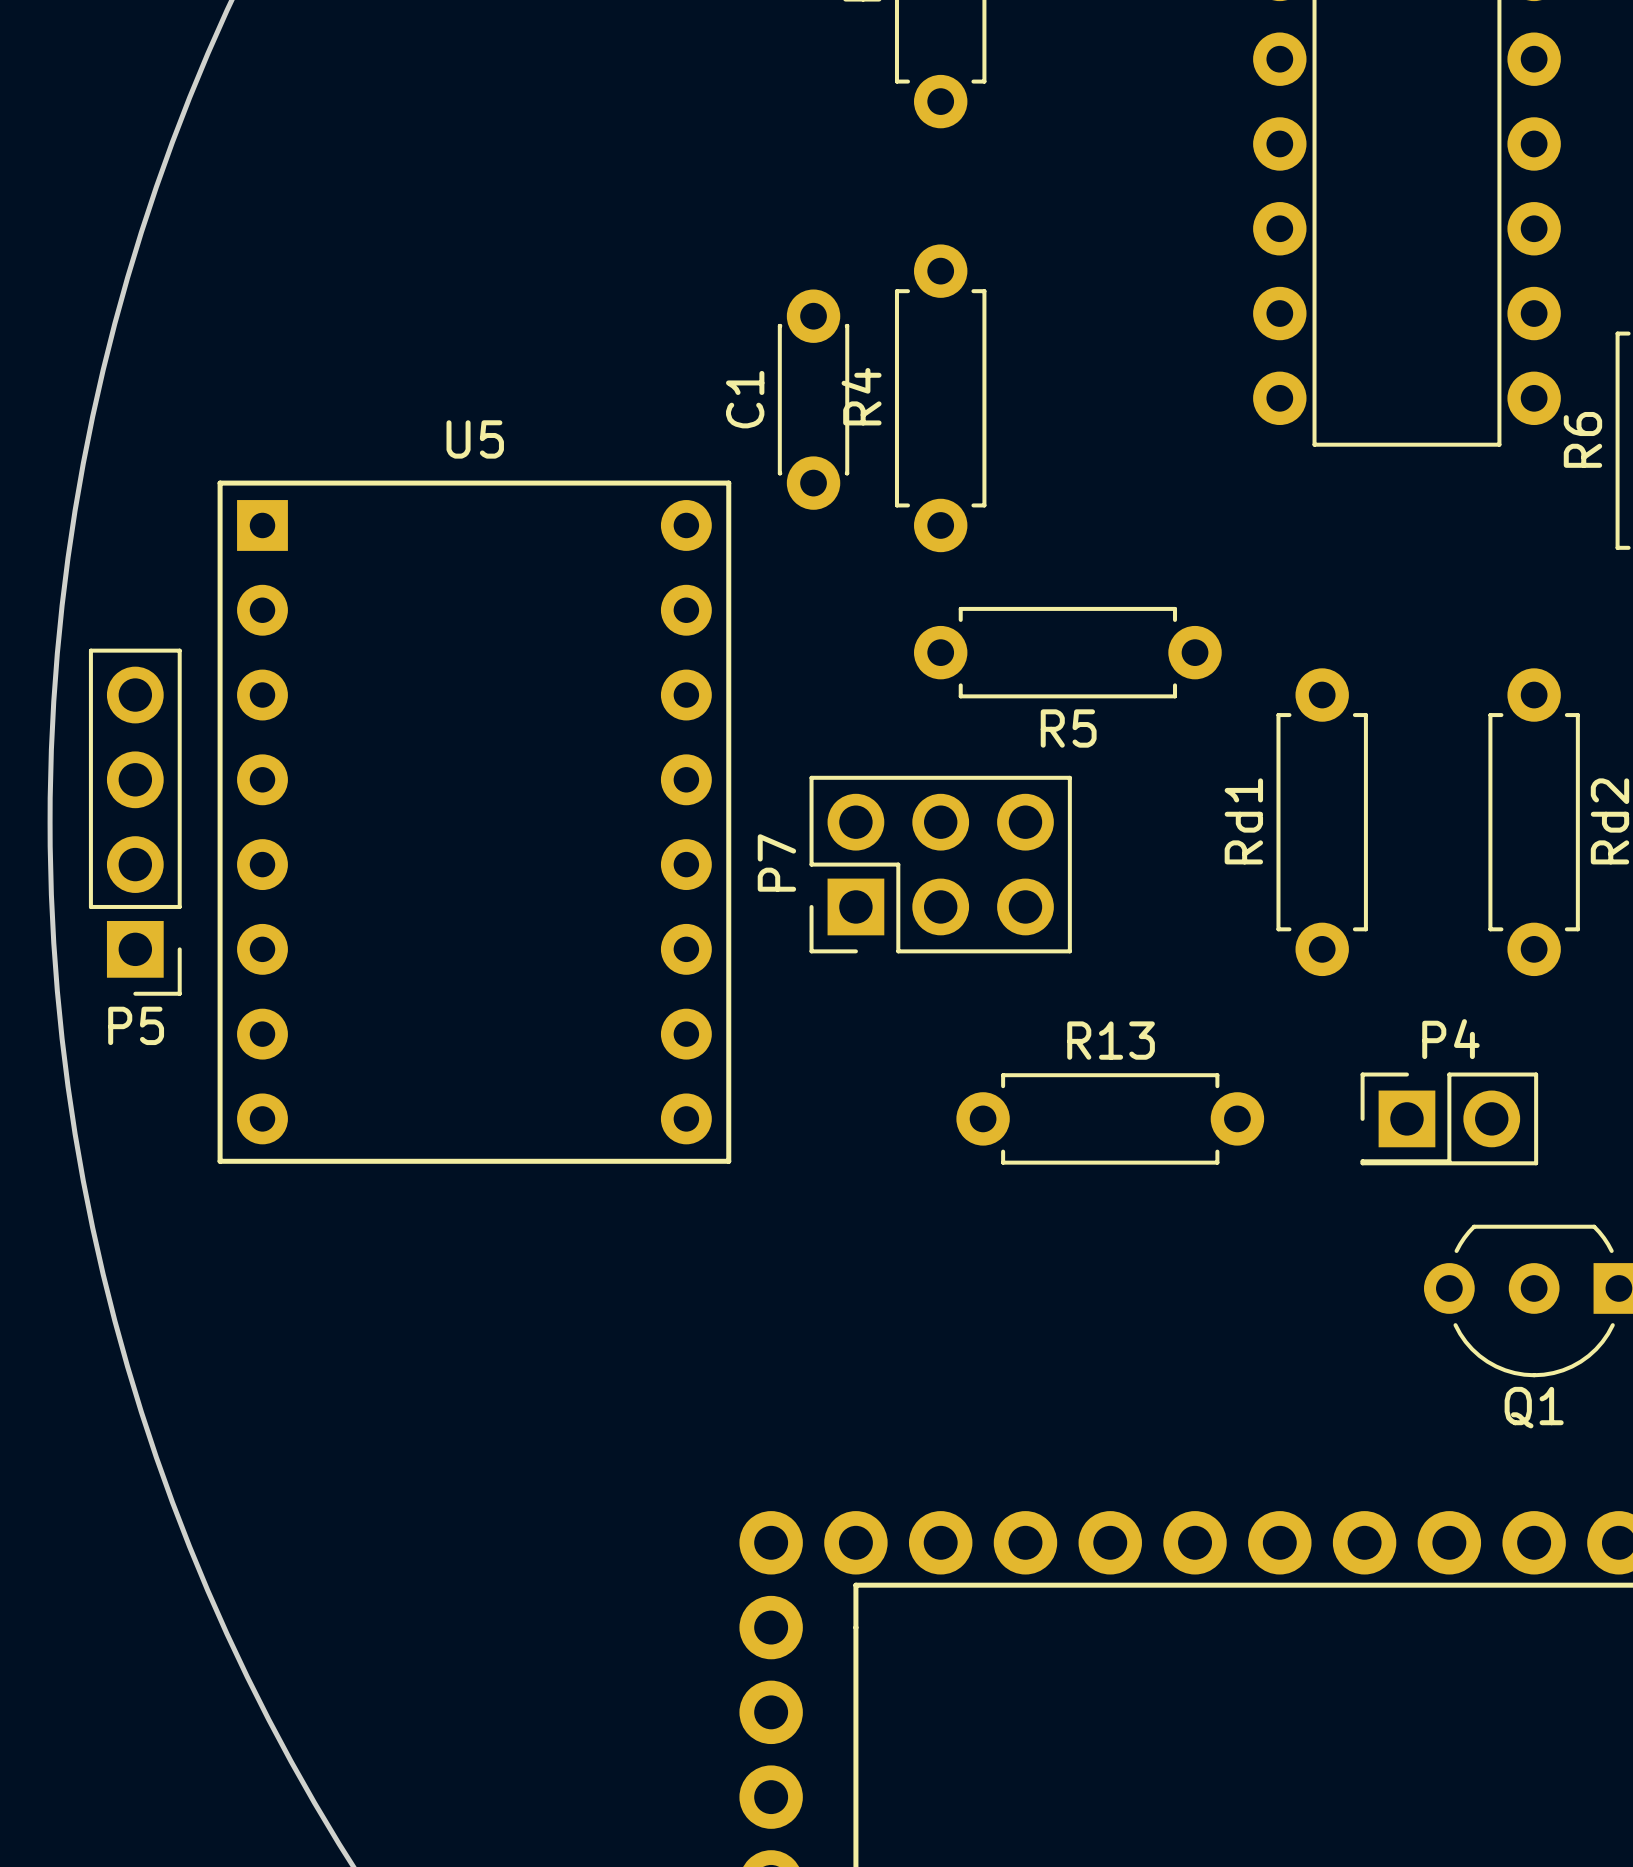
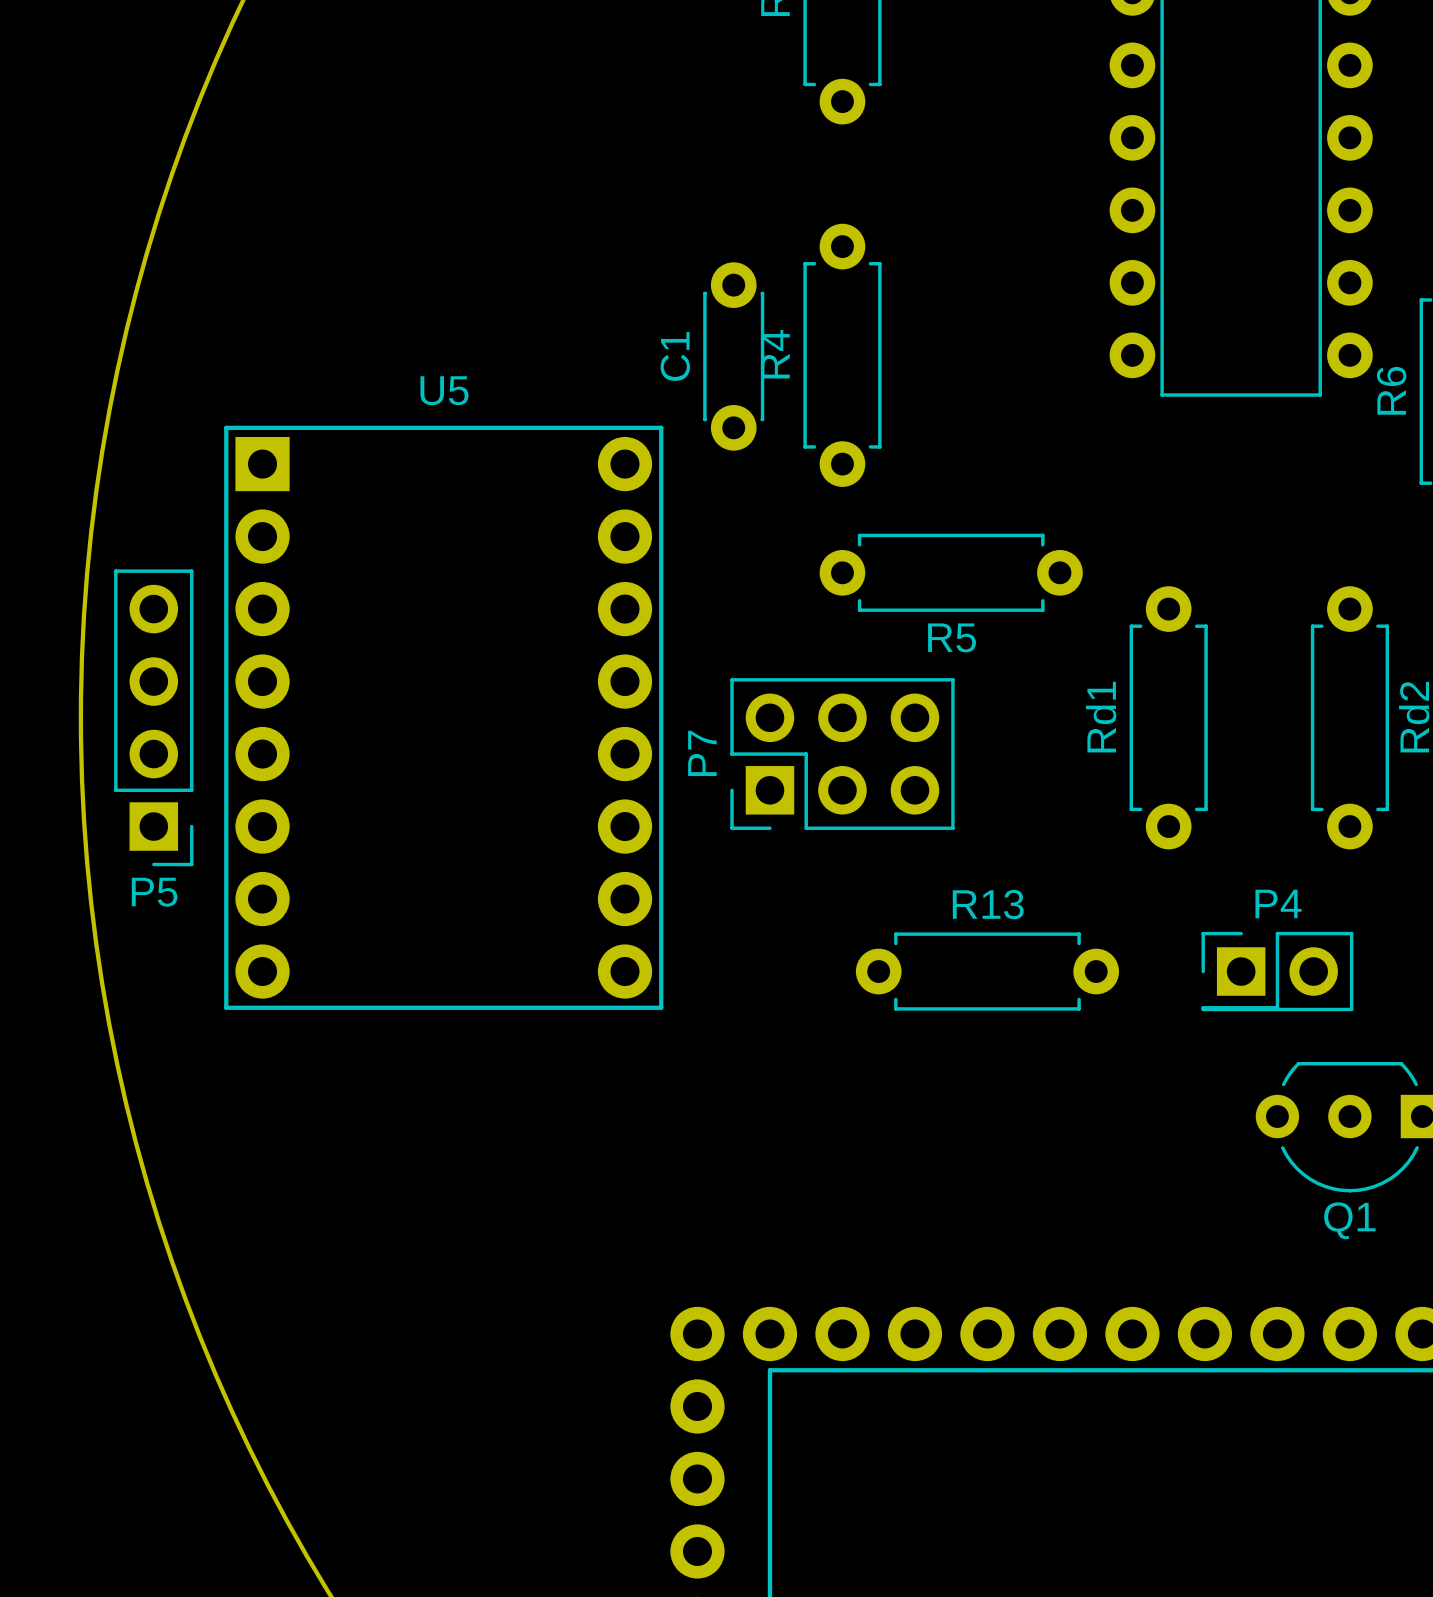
U5 footprint: [217, 480, 732, 1164] -> [224, 425, 664, 1010]

